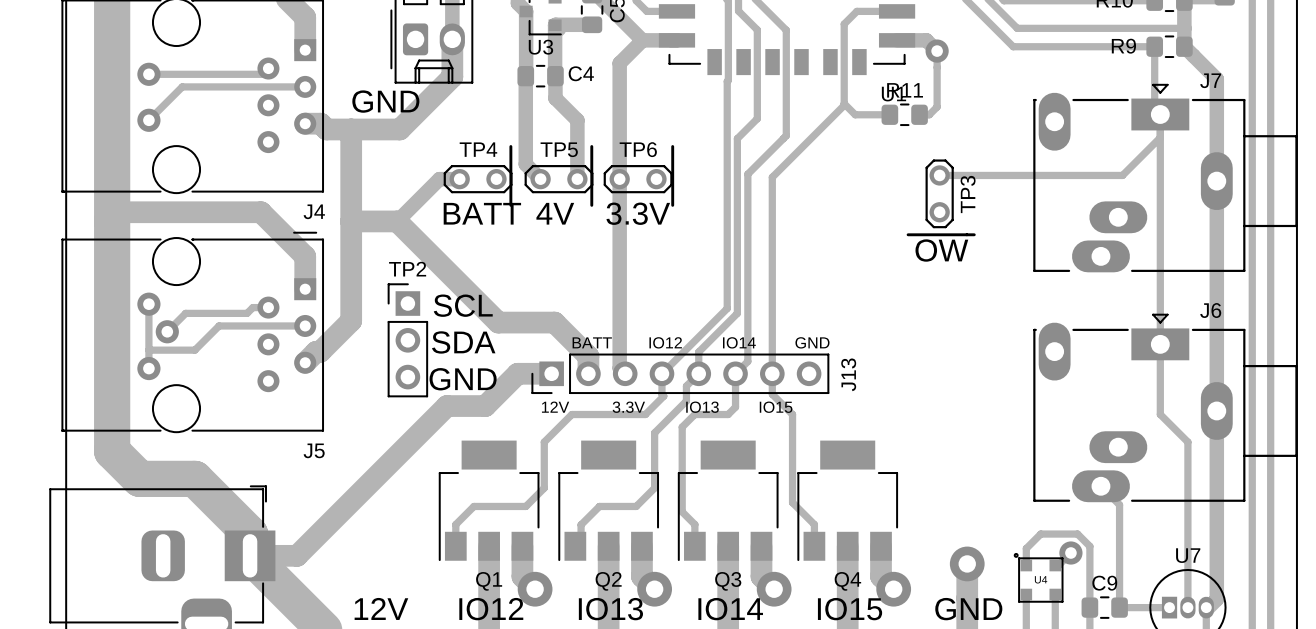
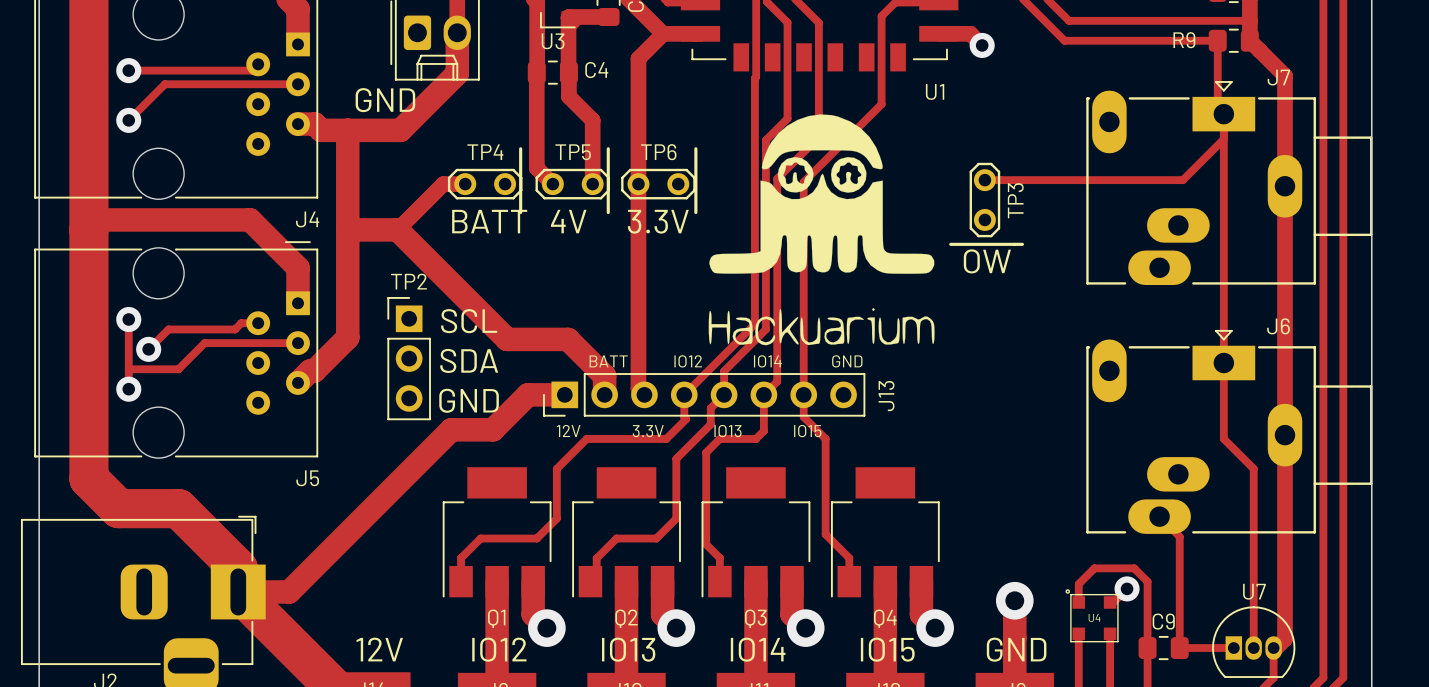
track: (937, 51) (937, 106) (929, 114) (919, 114) -> none
track: (844, 103) (855, 114) (889, 114) -> none
drawing: none -> [708, 114, 935, 346]
R11: (904, 114) -> none

